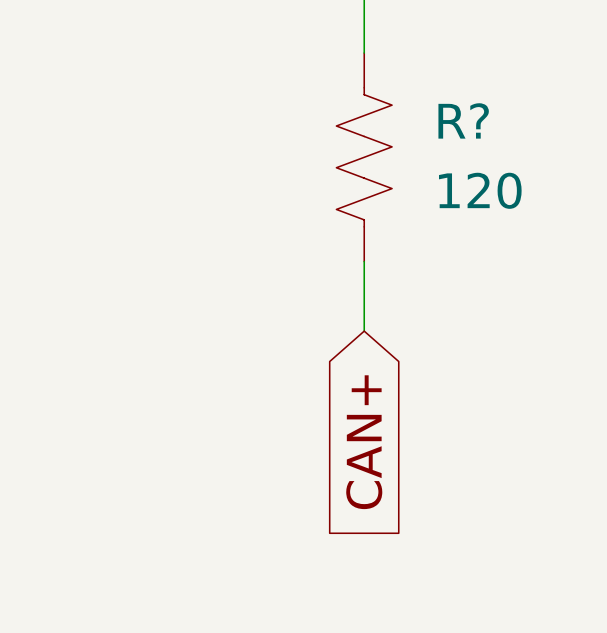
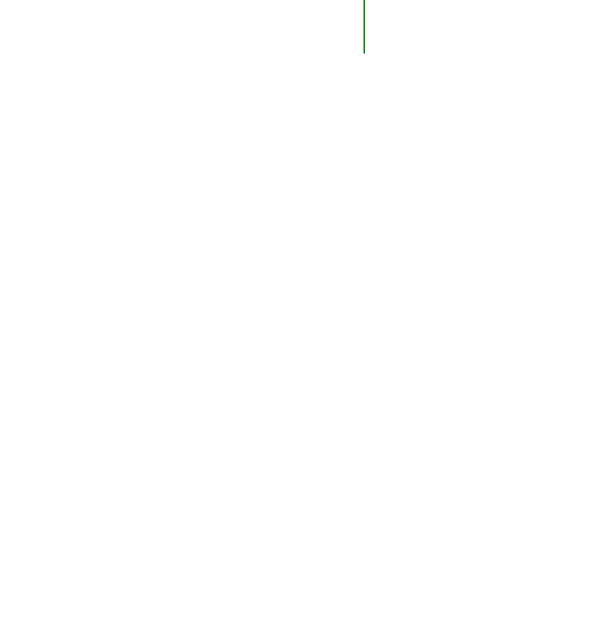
R?: 120 (364, 157) -> none
wire: (364, 261) (364, 331) -> none
global label: CAN+ (364, 442) -> none

